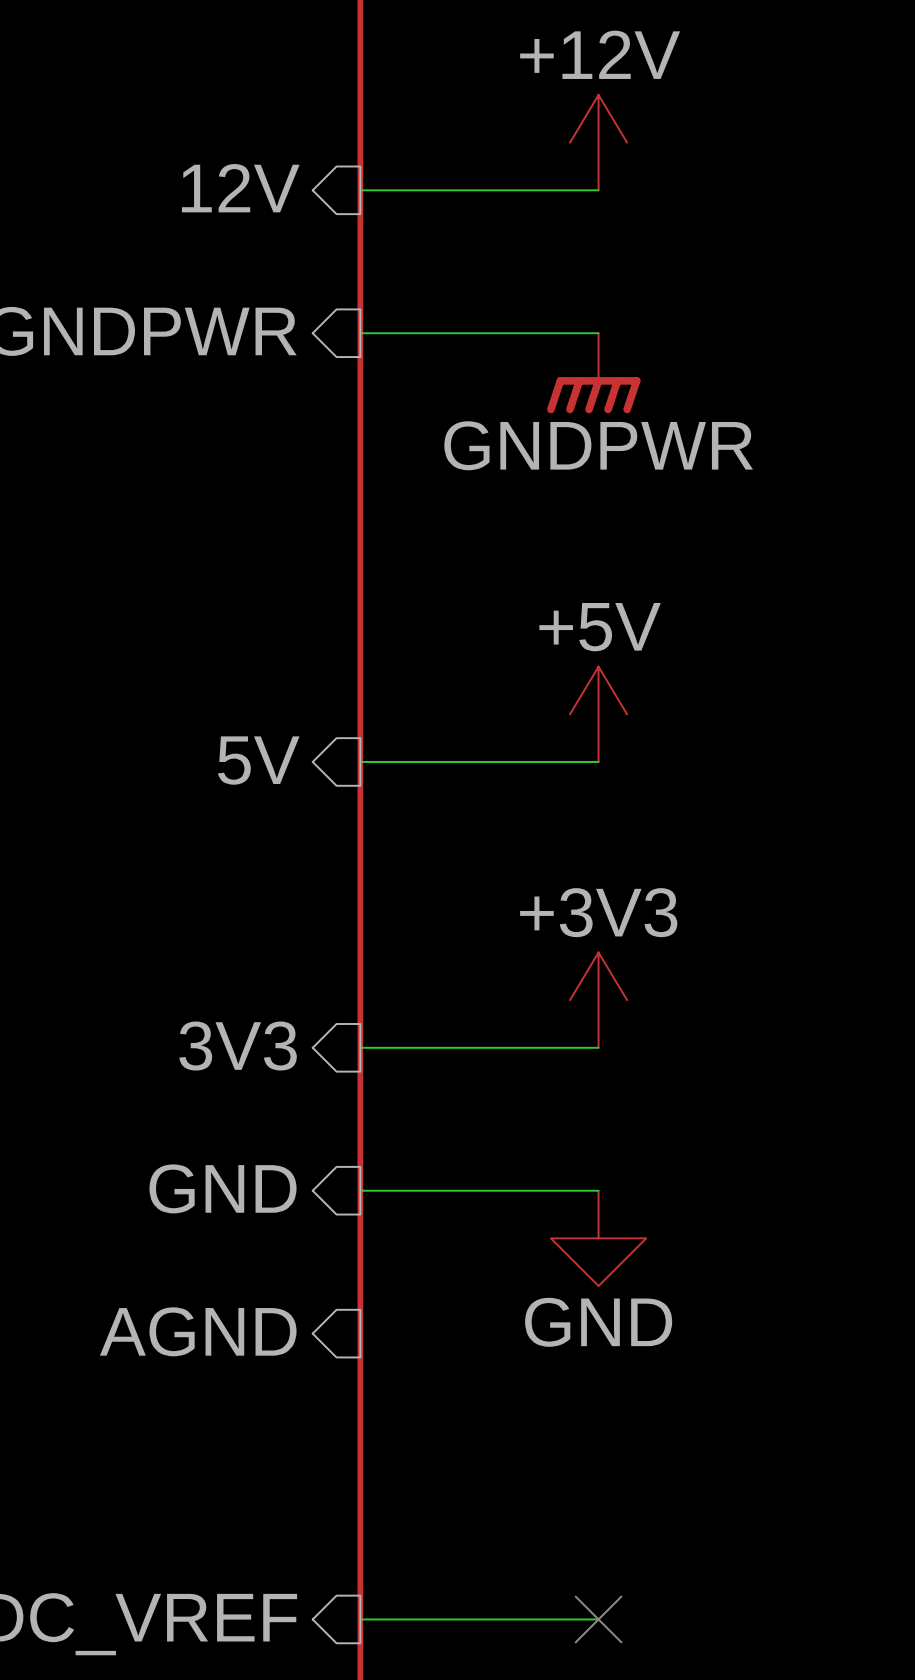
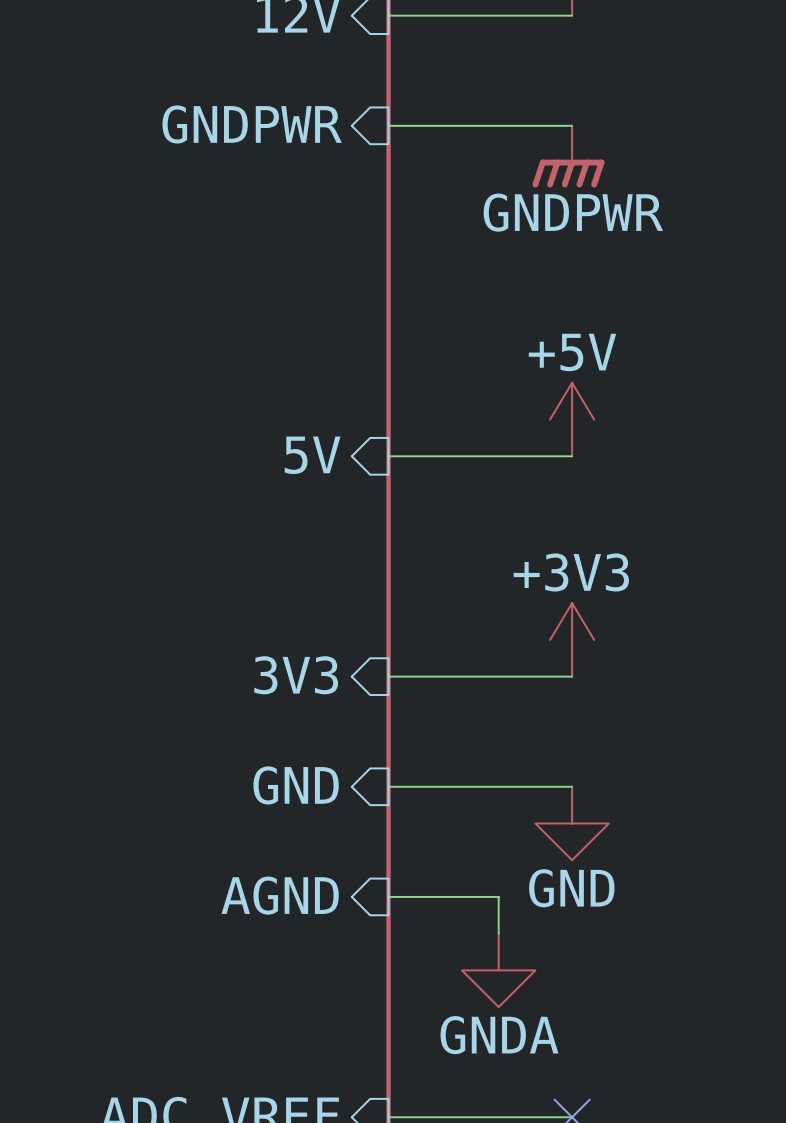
wire: none -> (388, 896) (498, 896) (498, 933)
power symbol: none -> GNDA (498, 970)

